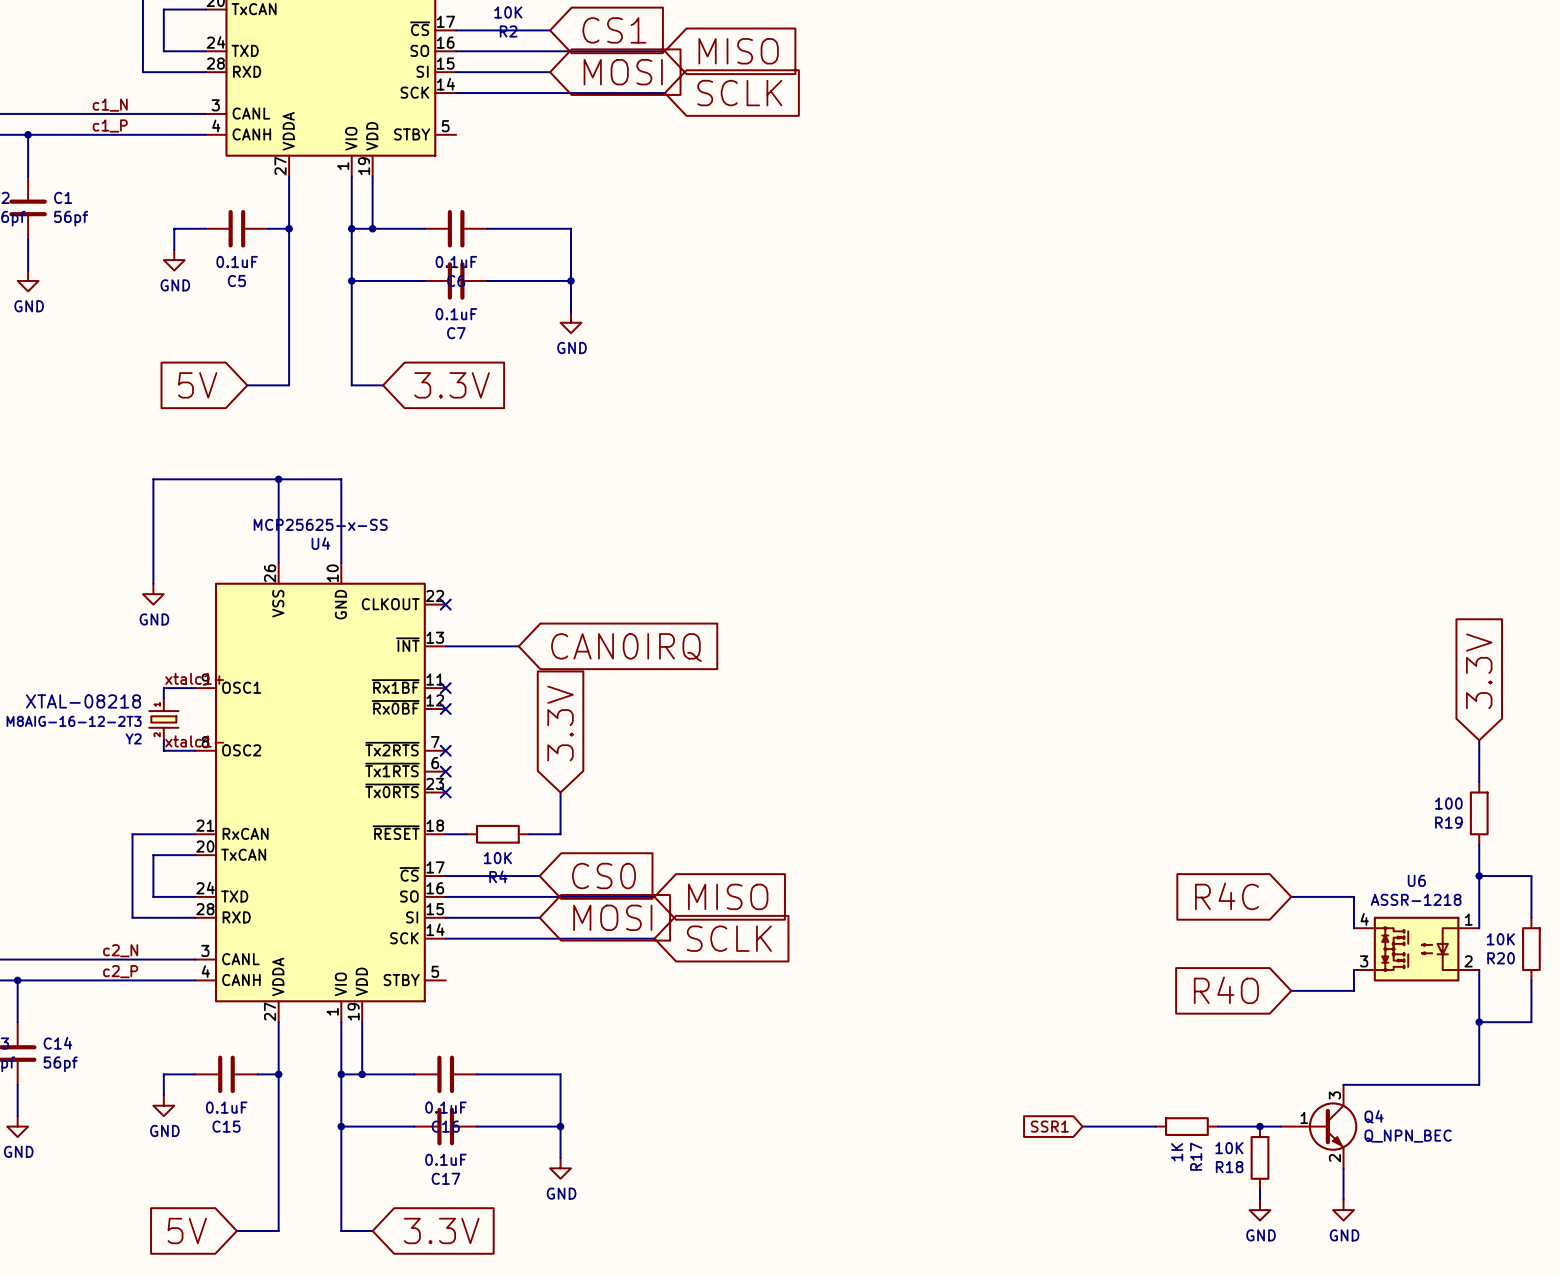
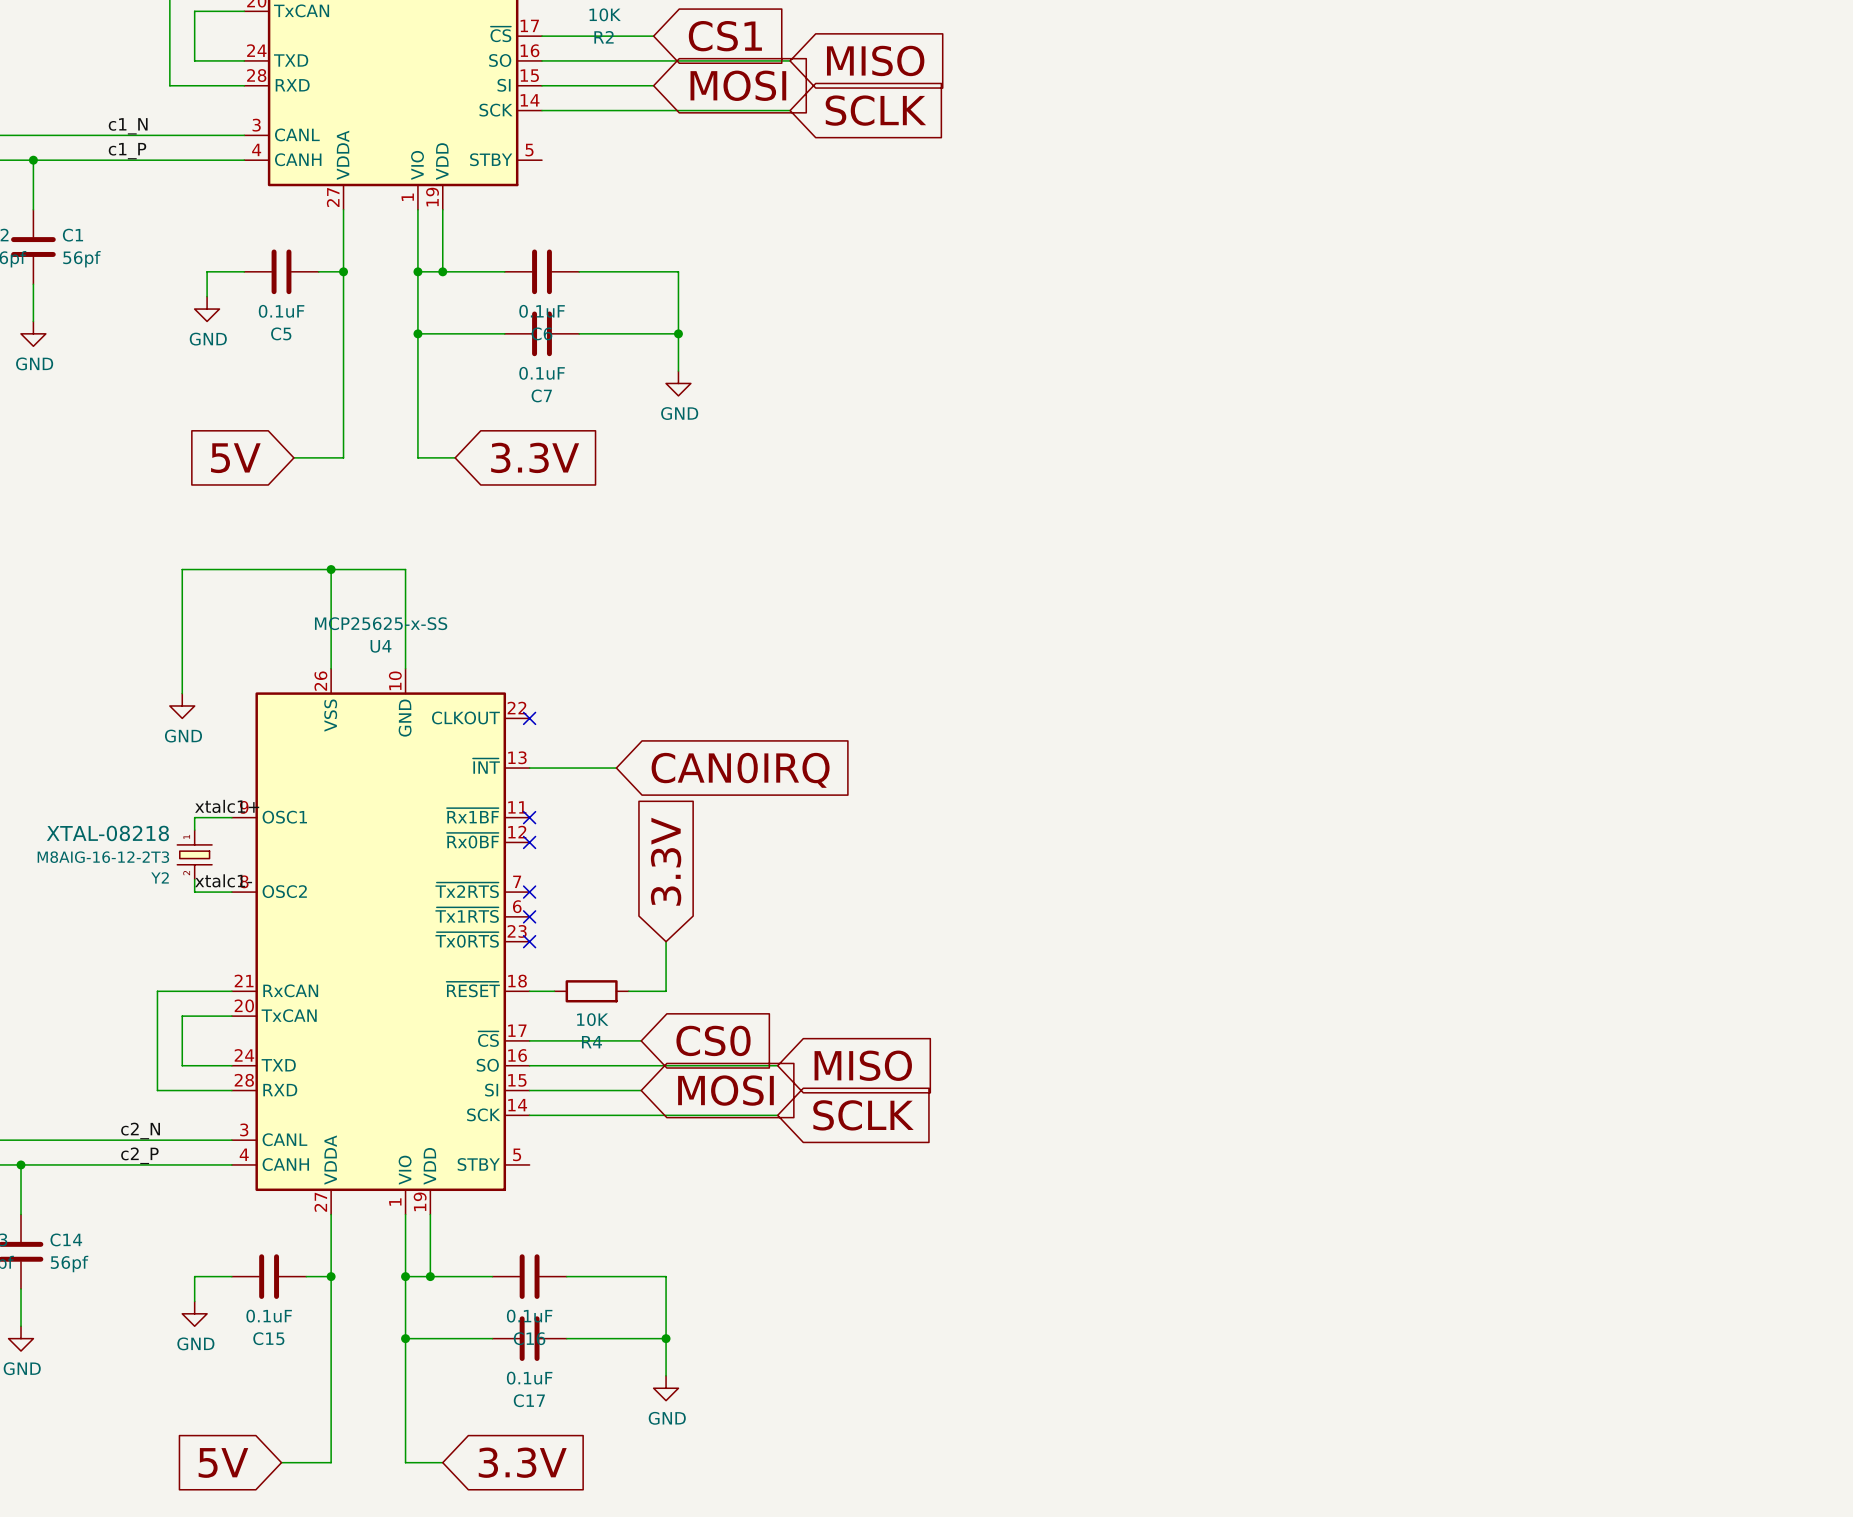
global label: 3.3V (1479, 671) -> none
wire: (1479, 740) (1479, 782) -> none
R19: 100 (1479, 813) -> none
wire: (1479, 844) (1479, 928) -> none
wire: (1479, 876) (1531, 876) (1531, 917) -> none
junction: (1479, 876) -> none
global label: R4C (1226, 896) -> none
wire: (1291, 896) (1353, 896) (1353, 928) -> none
U6: ASSR-1218 (1416, 949) -> none
R20: 10K (1531, 949) -> none
wire: (1353, 969) (1353, 990) (1291, 990) -> none
wire: (1479, 969) (1479, 1084) (1343, 1084) -> none
wire: (1531, 980) (1531, 1022) (1479, 1022) -> none
global label: R4O (1226, 990) -> none
junction: (1479, 1022) -> none
global label: SSR1 (1049, 1126) -> none
wire: (1082, 1126) (1155, 1126) -> none
R17: 1K (1186, 1126) -> none
wire: (1218, 1126) (1280, 1126) -> none
junction: (1260, 1126) -> none
Q4: Q_NPN_BEC (1319, 1126) -> none
R18: 10K (1260, 1157) -> none
wire: (1343, 1168) (1343, 1199) -> none
wire: (1260, 1189) (1260, 1199) -> none
power symbol: GND (1260, 1210) -> none
power symbol: GND (1343, 1210) -> none

